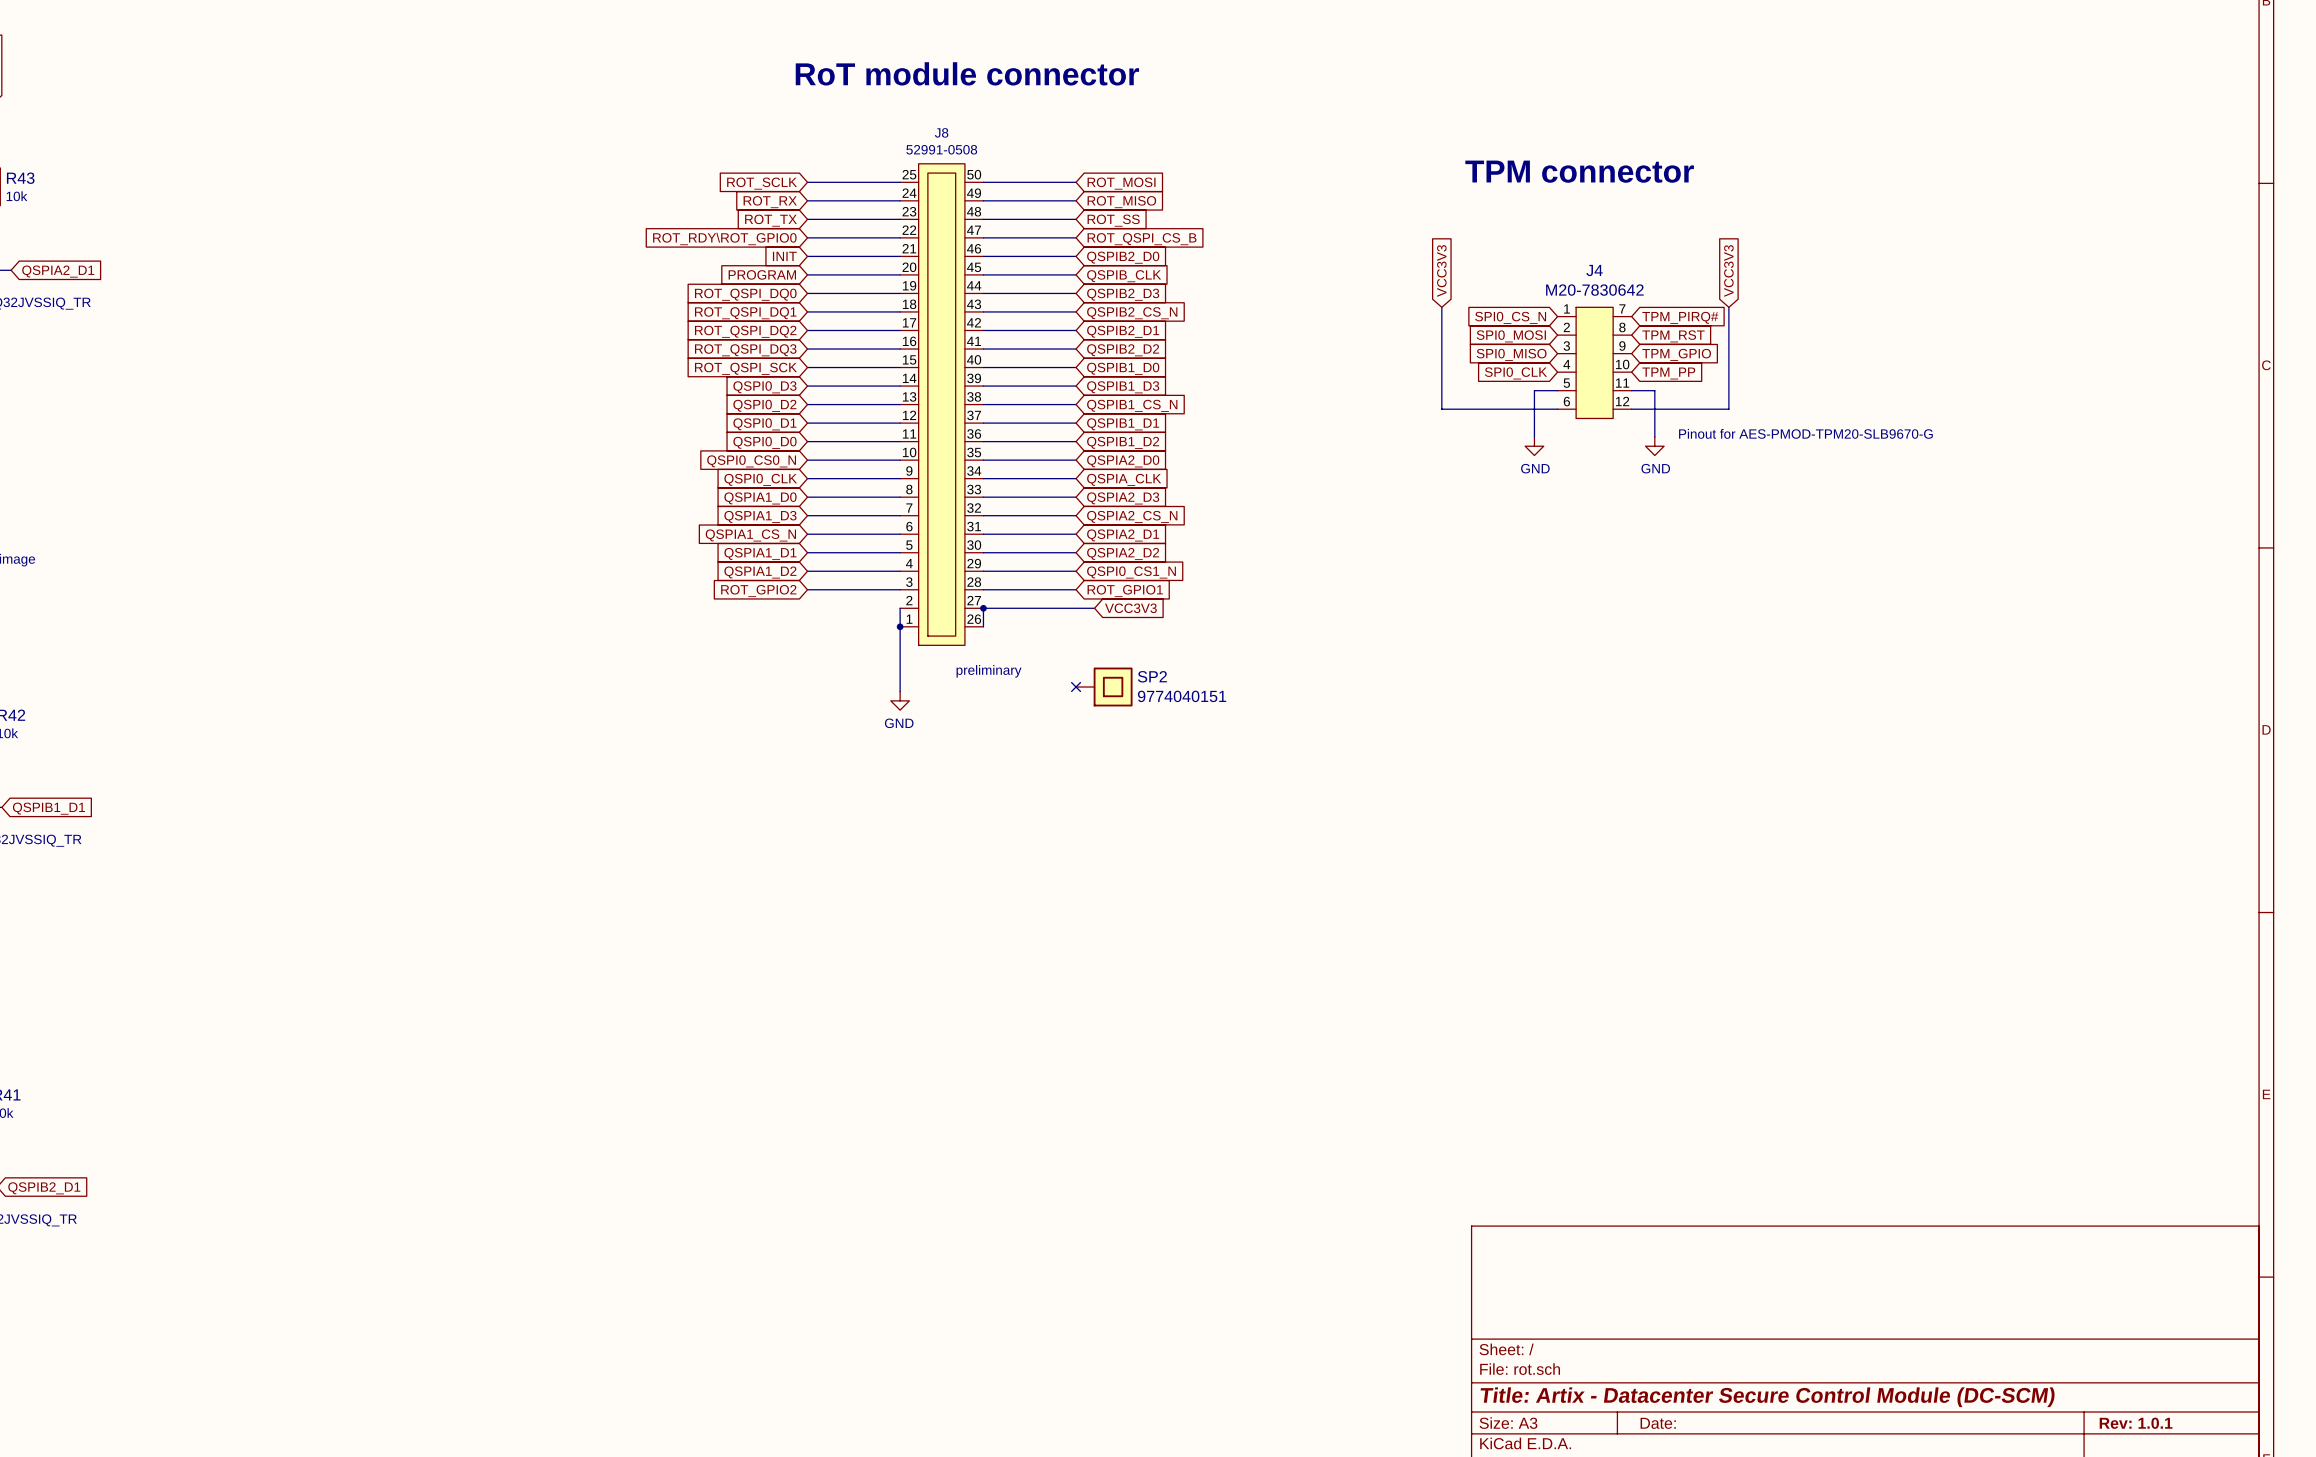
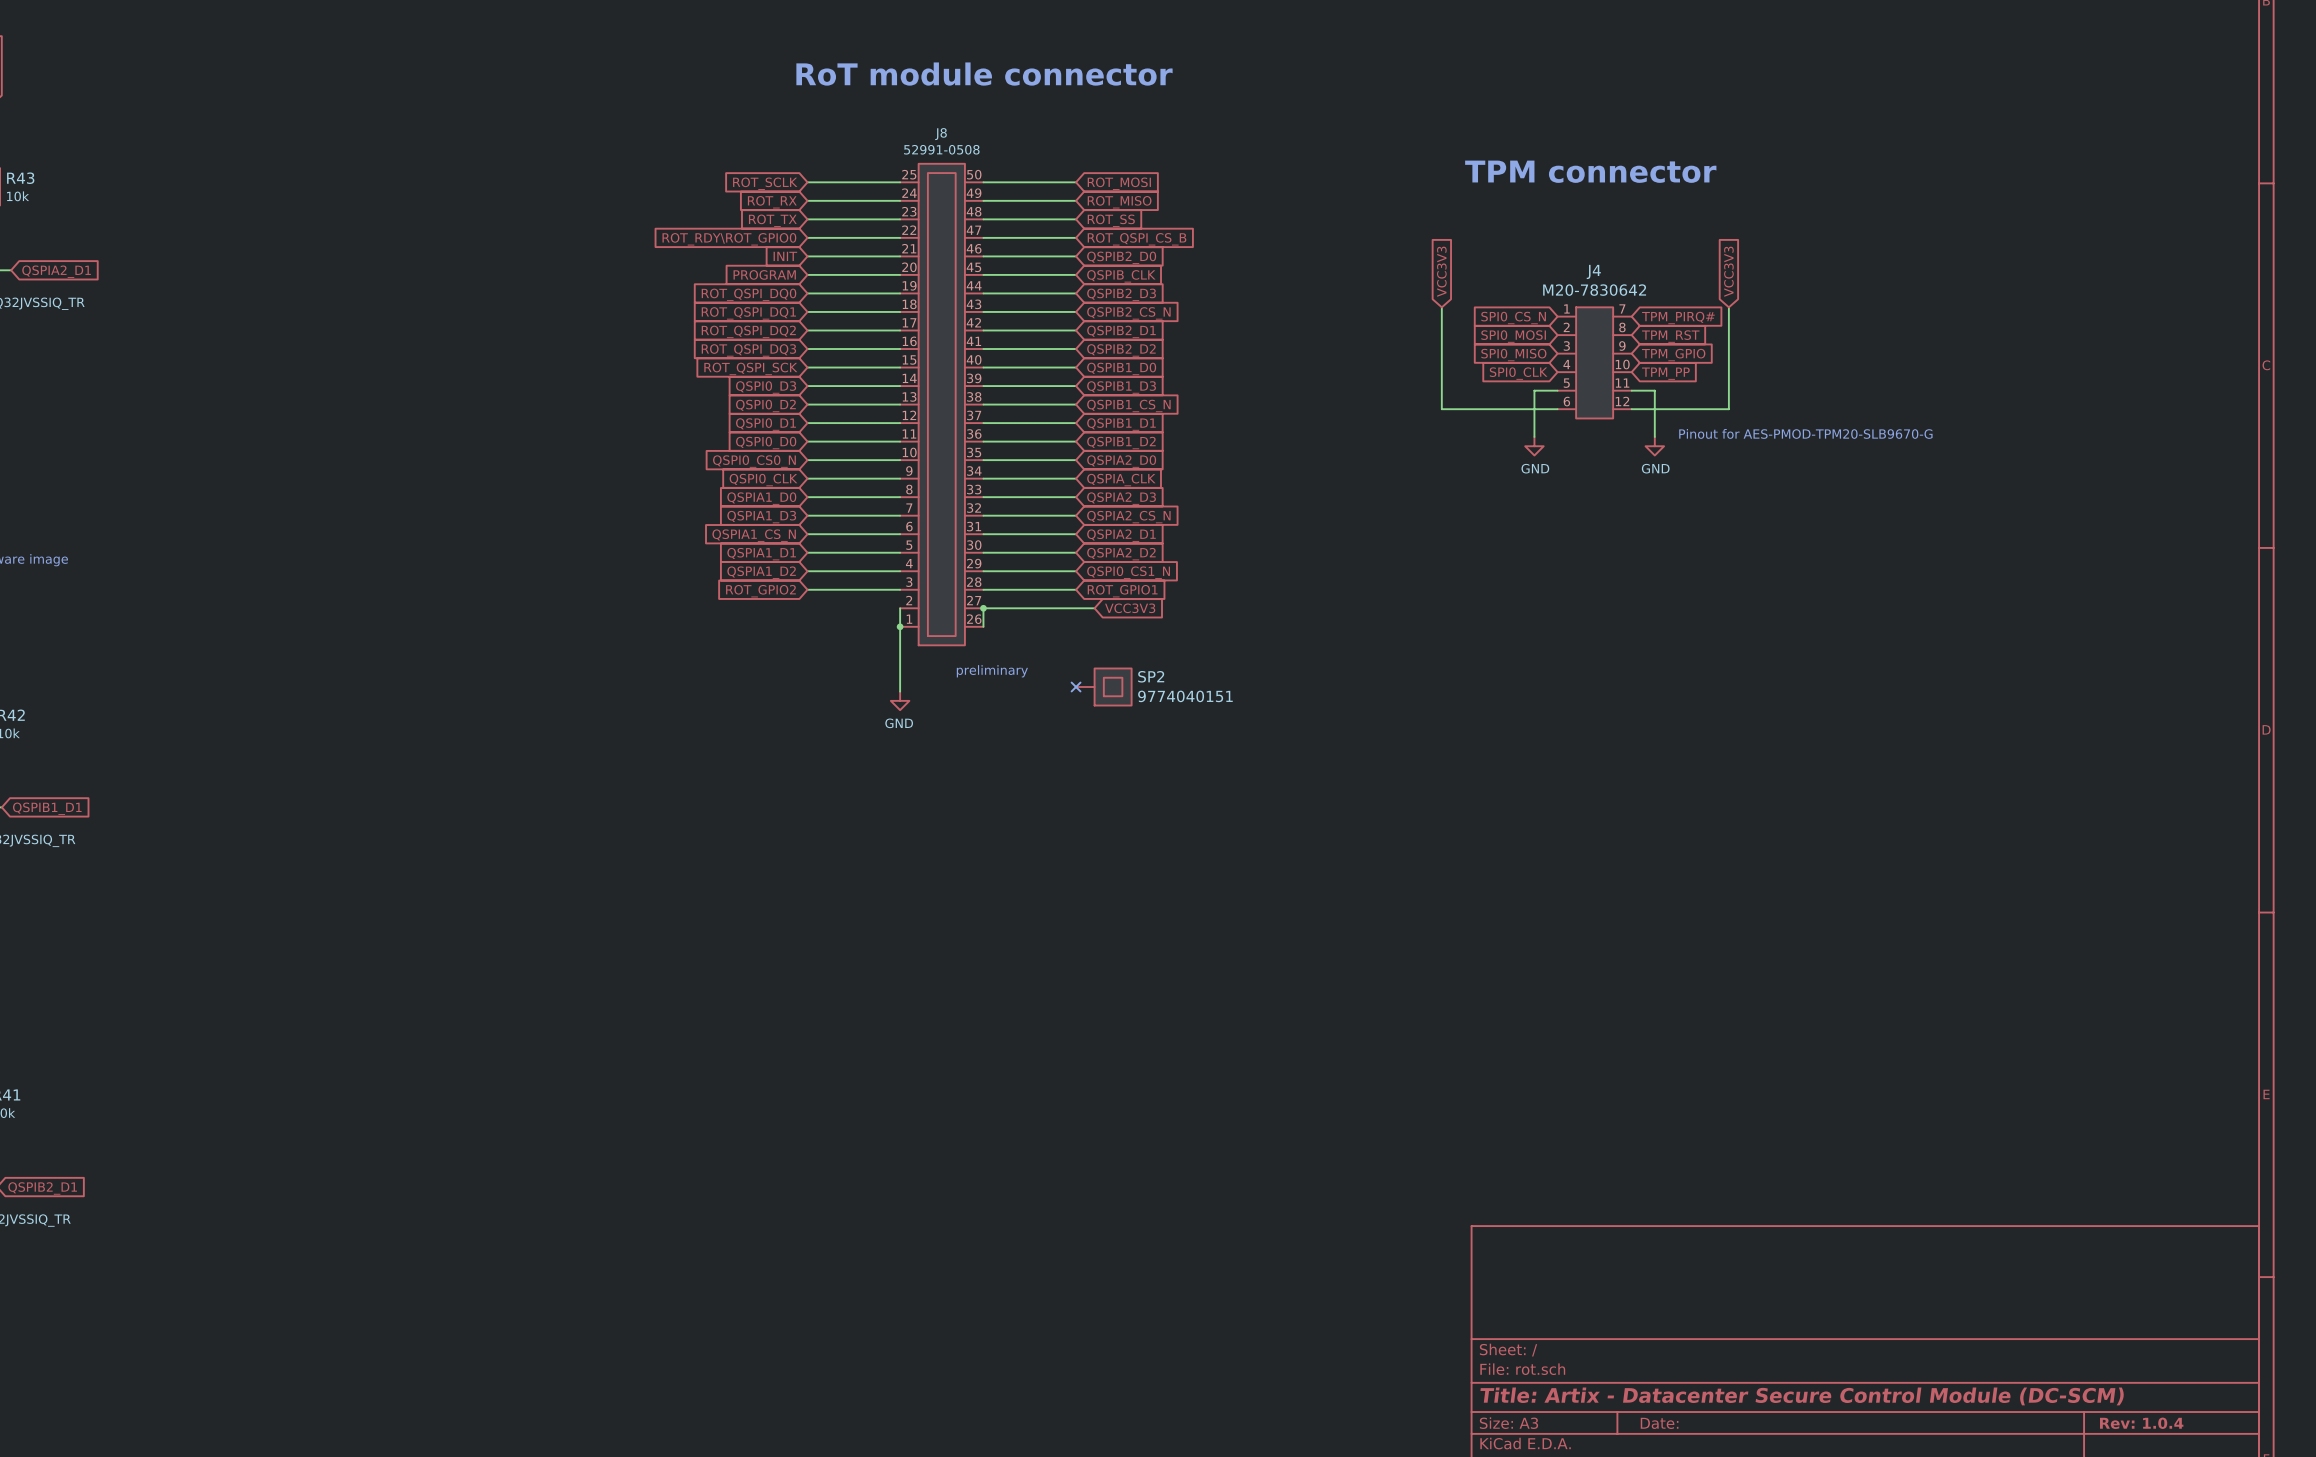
title block: Rev: 1.0.1 (2136, 1423) -> Rev: 1.0.4 (2141, 1423)

